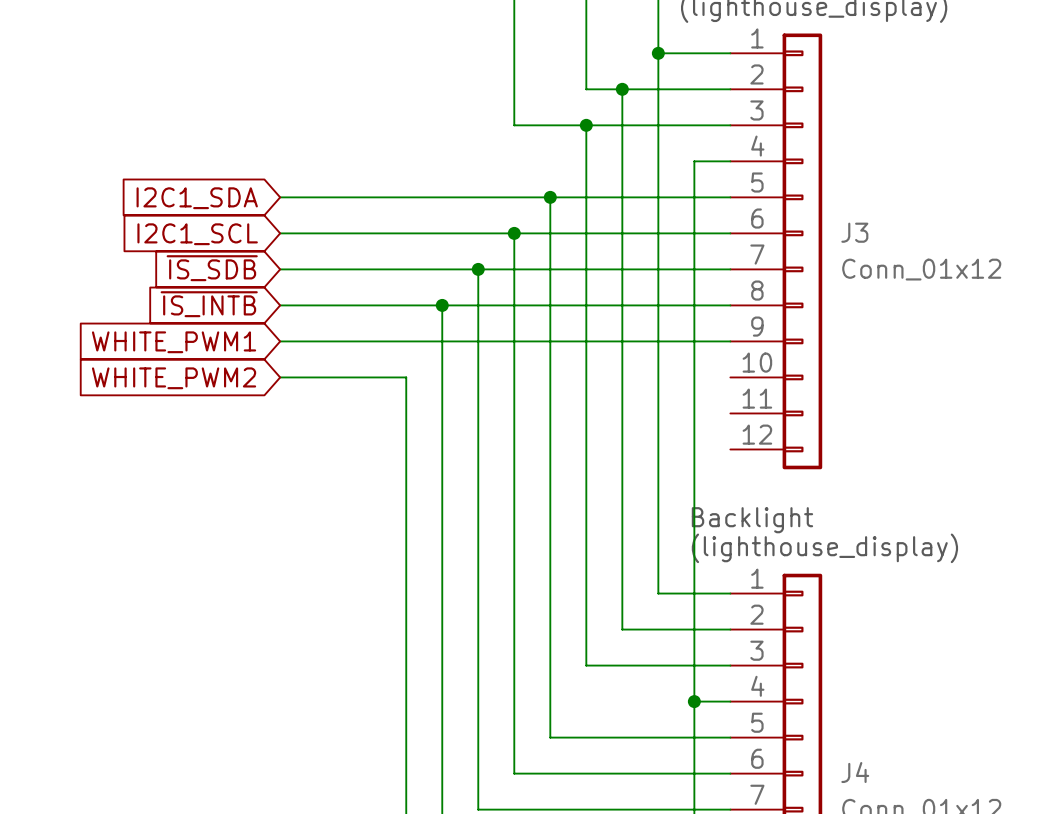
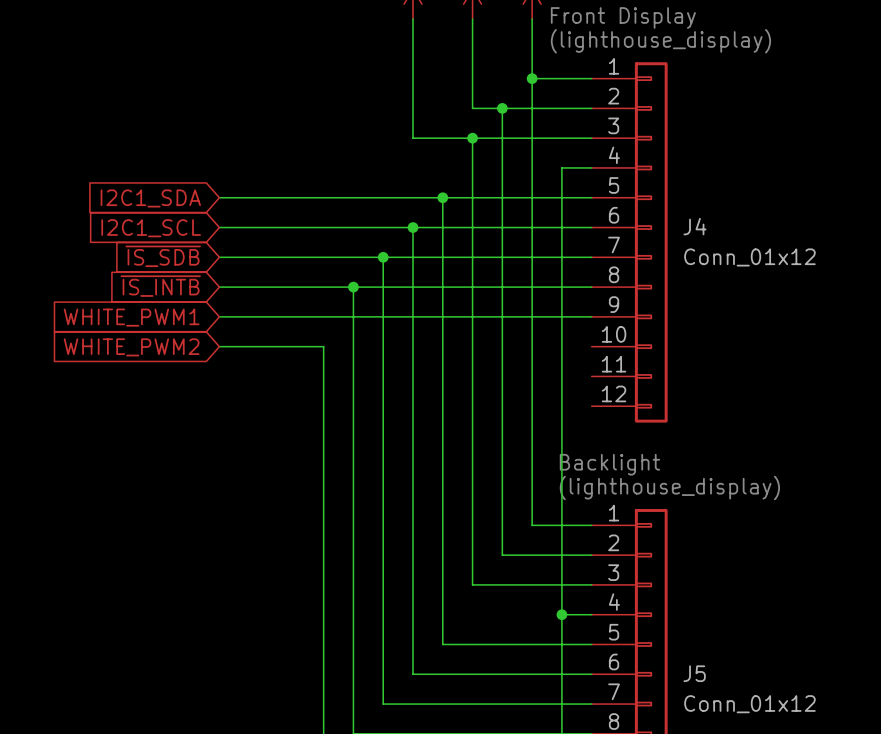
J3 name: J3 (854, 232) -> J4 (694, 226)
J4 name: J4 (855, 772) -> J5 (694, 673)

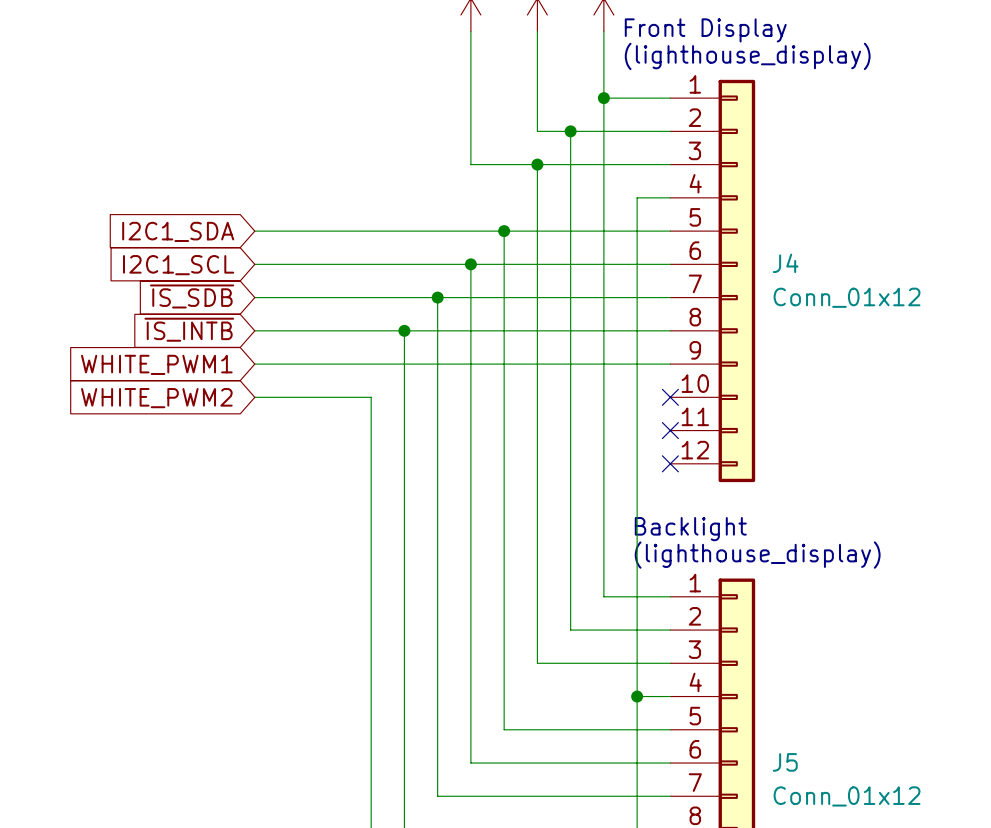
no-connect mark: none -> (670, 397)
no-connect mark: none -> (670, 430)
no-connect mark: none -> (670, 463)

